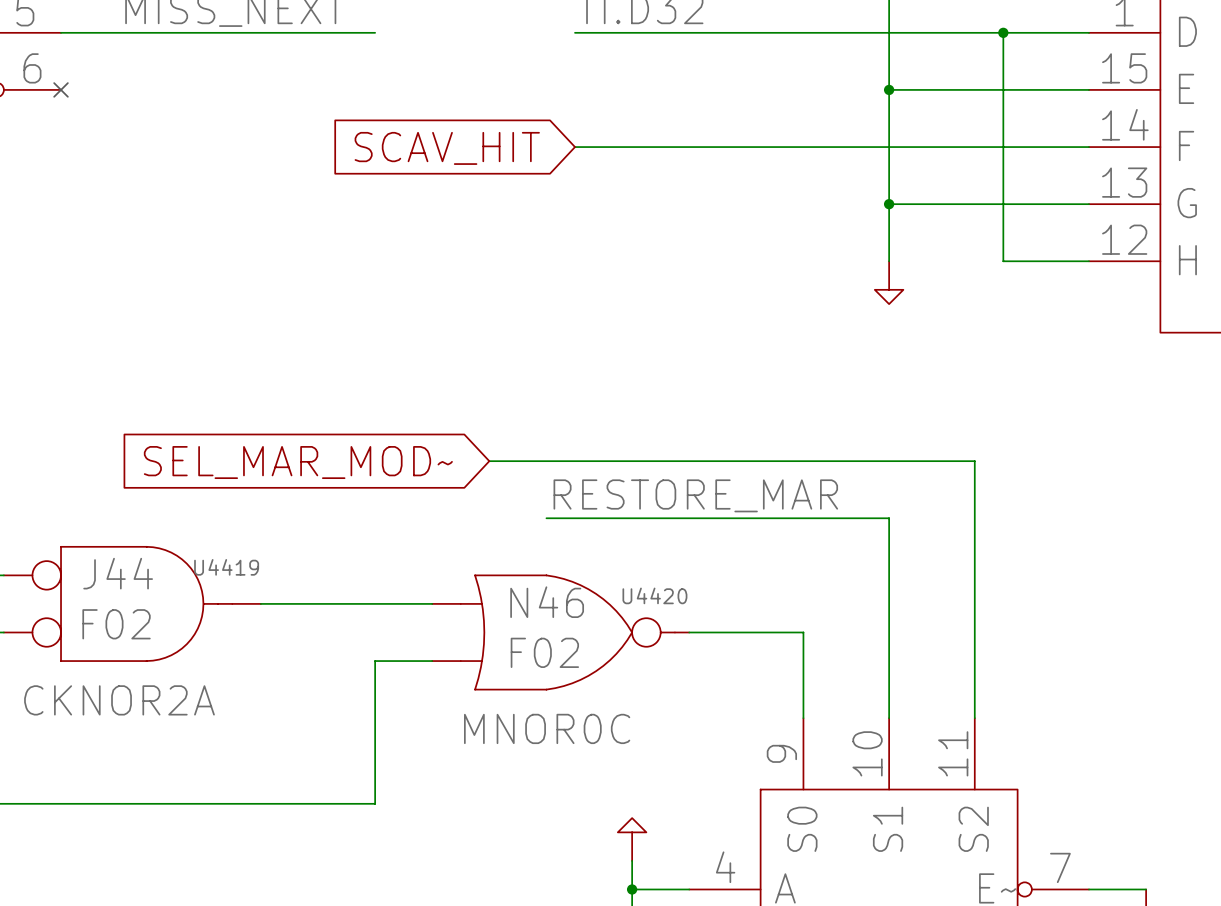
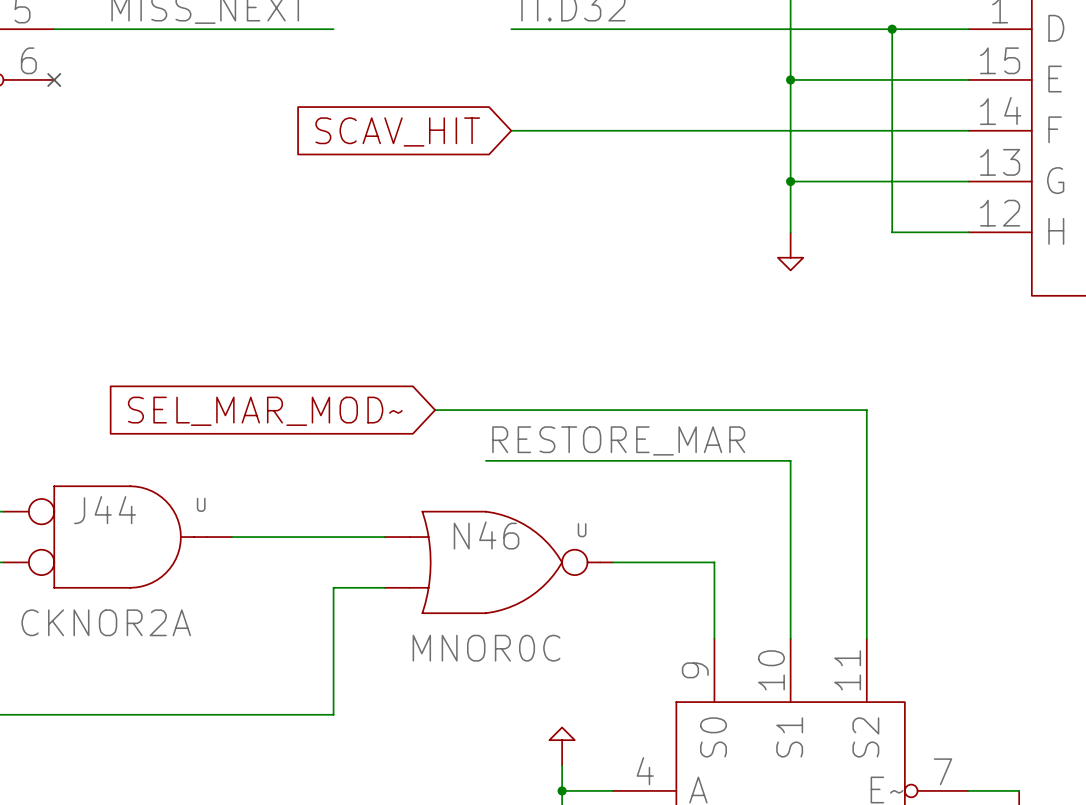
U4419 name: U4419 (226, 567) -> U (201, 504)
U4420 name: U4420 (654, 595) -> U (582, 530)
U4419 value: F02 (116, 624) -> none
U4420 value: F02 (544, 652) -> none

